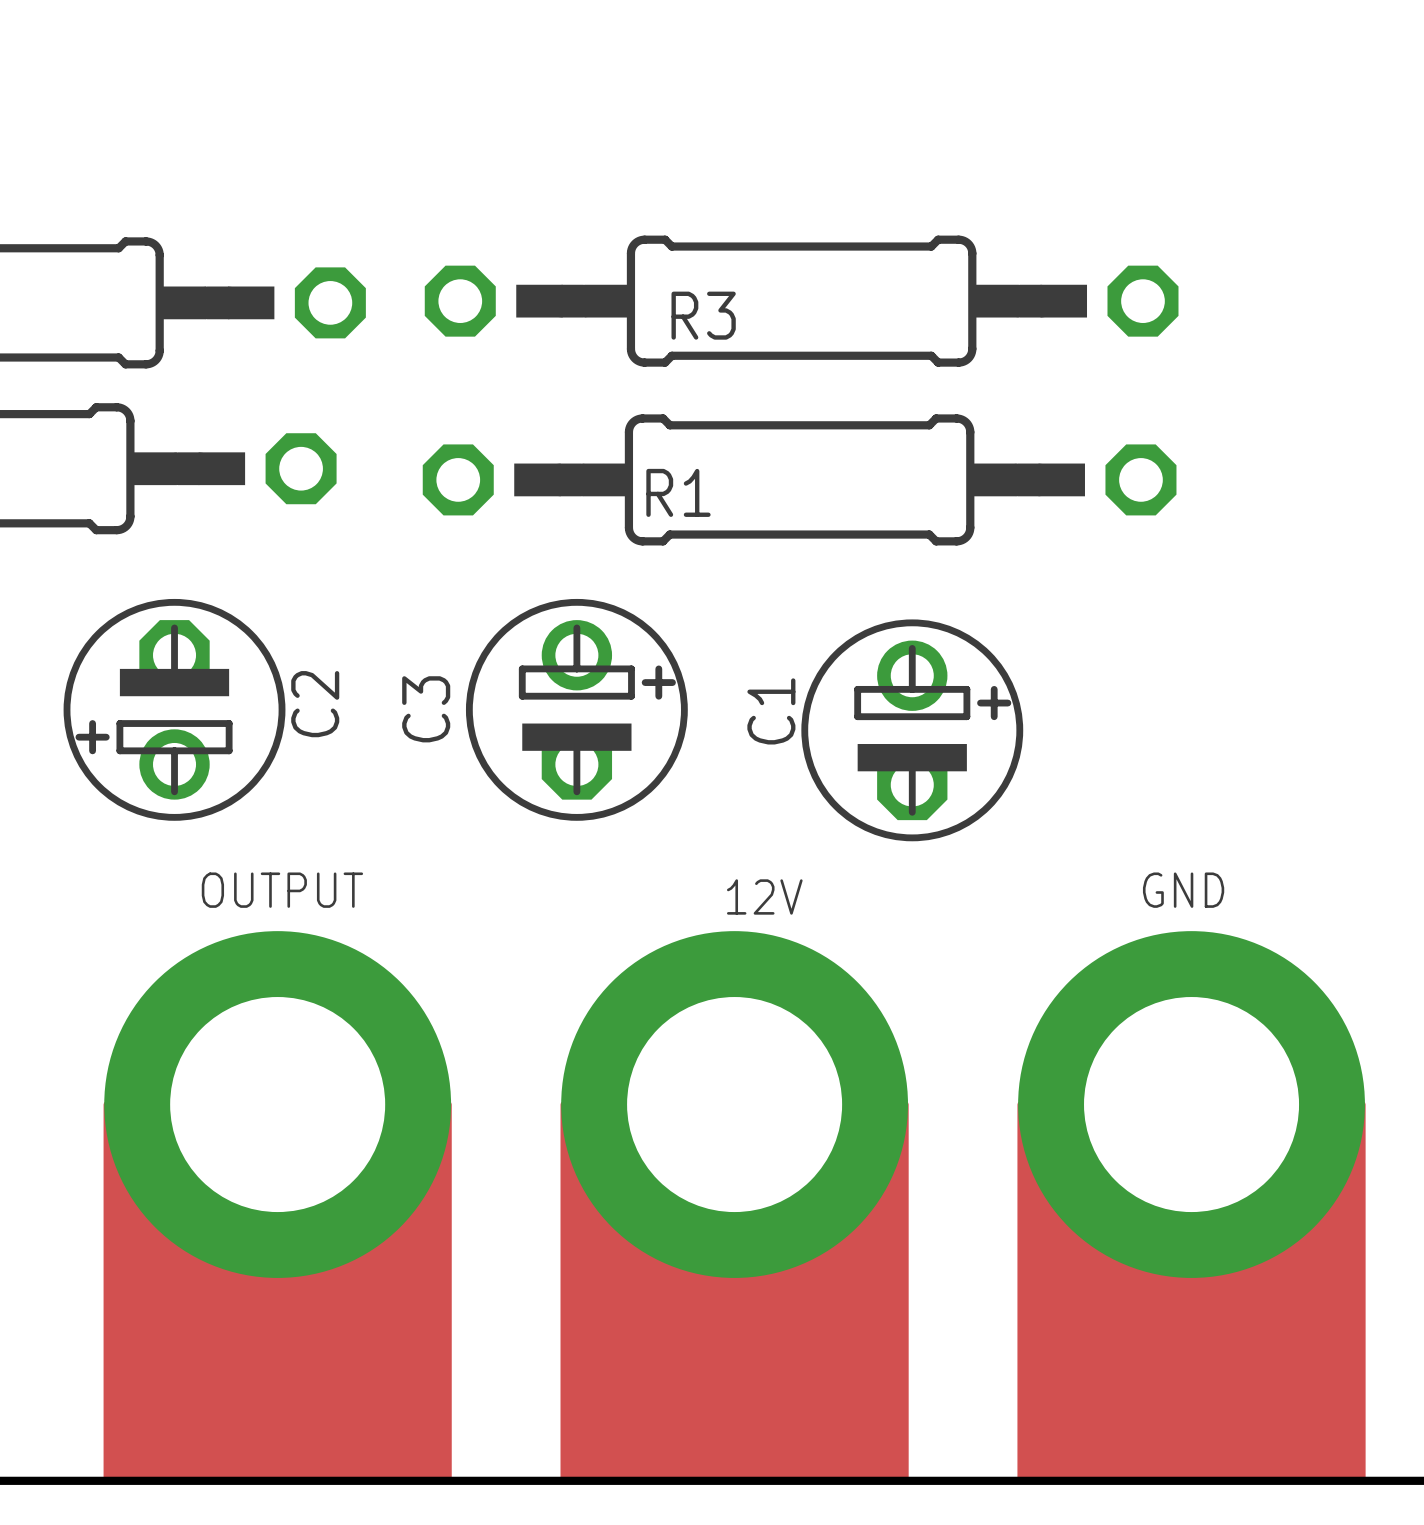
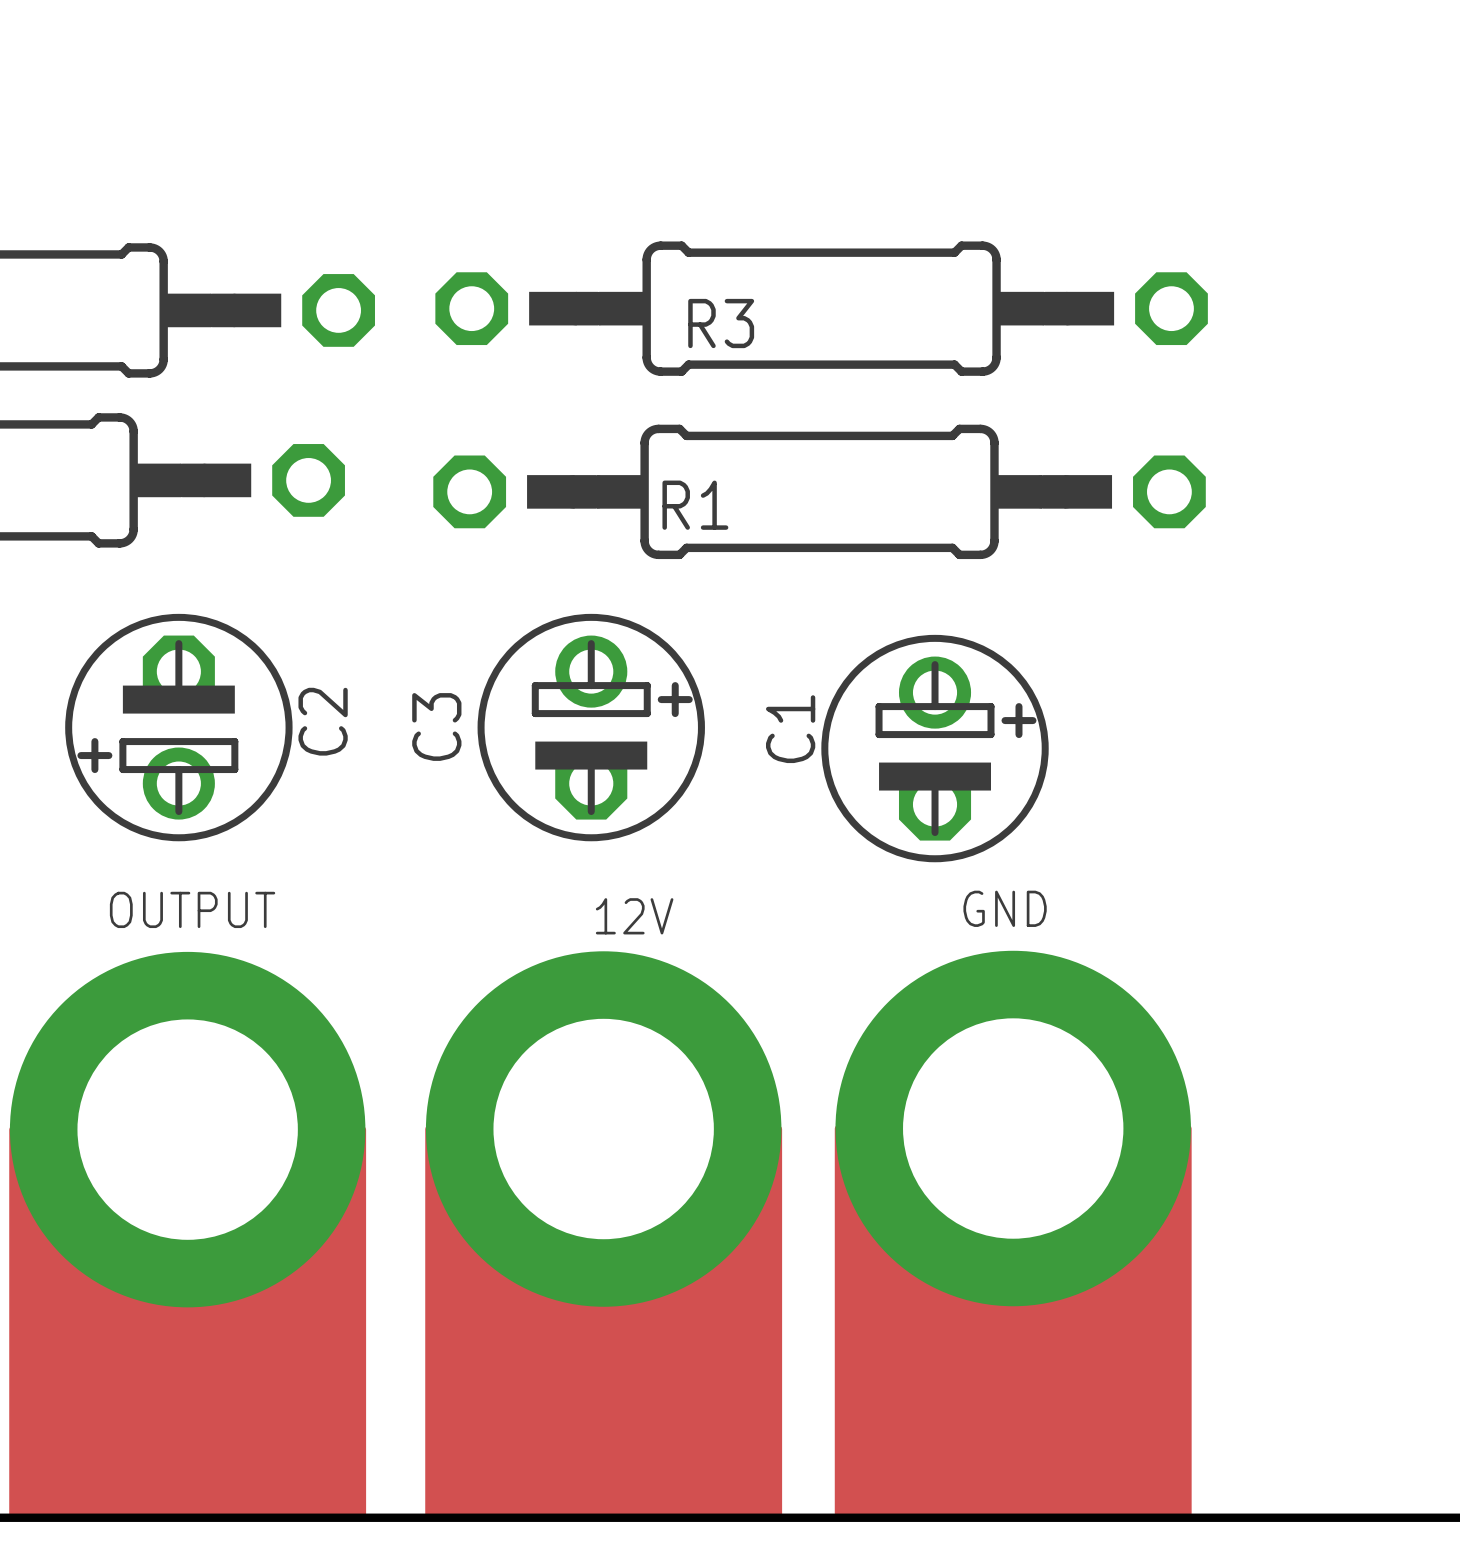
OUTPUT position: (277, 1207) -> (187, 1234)
12V position: (734, 1207) -> (603, 1234)
GND position: (1191, 1207) -> (1013, 1233)

